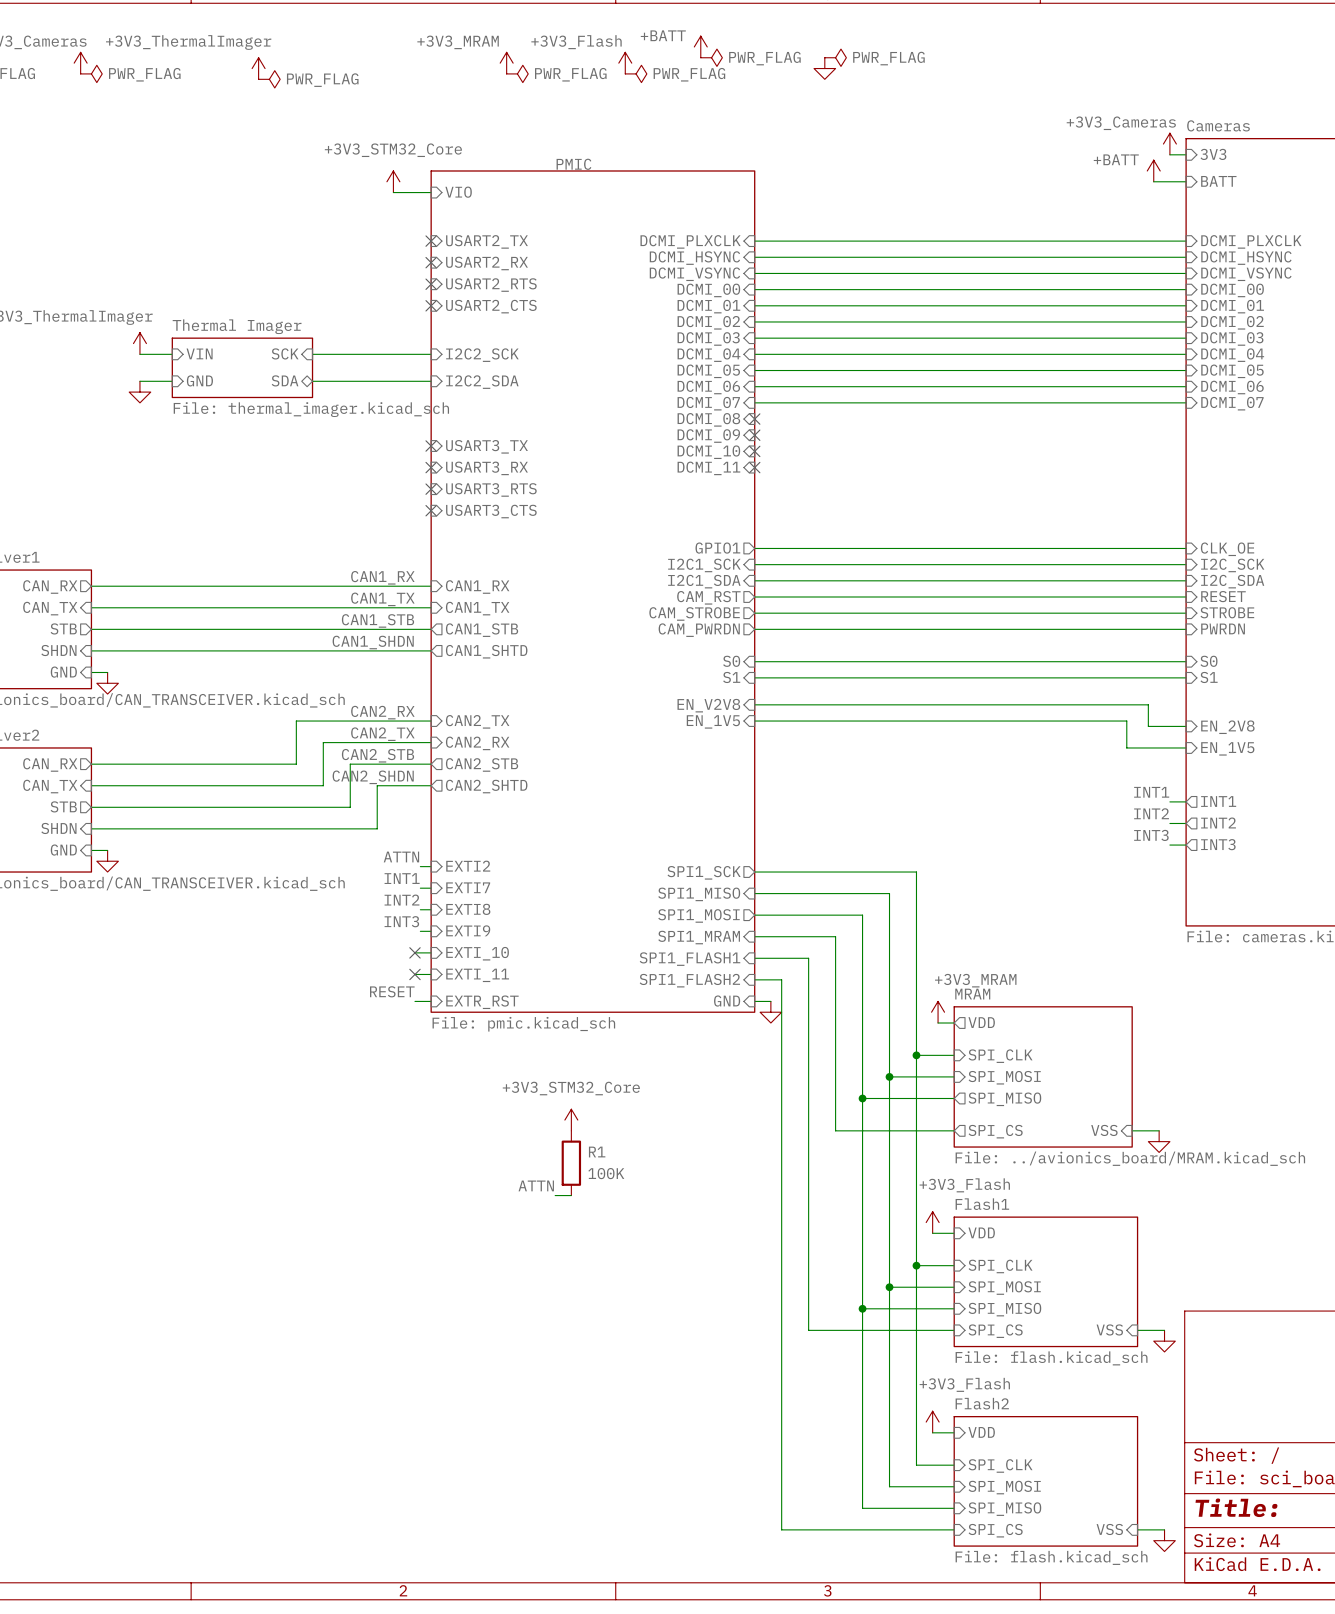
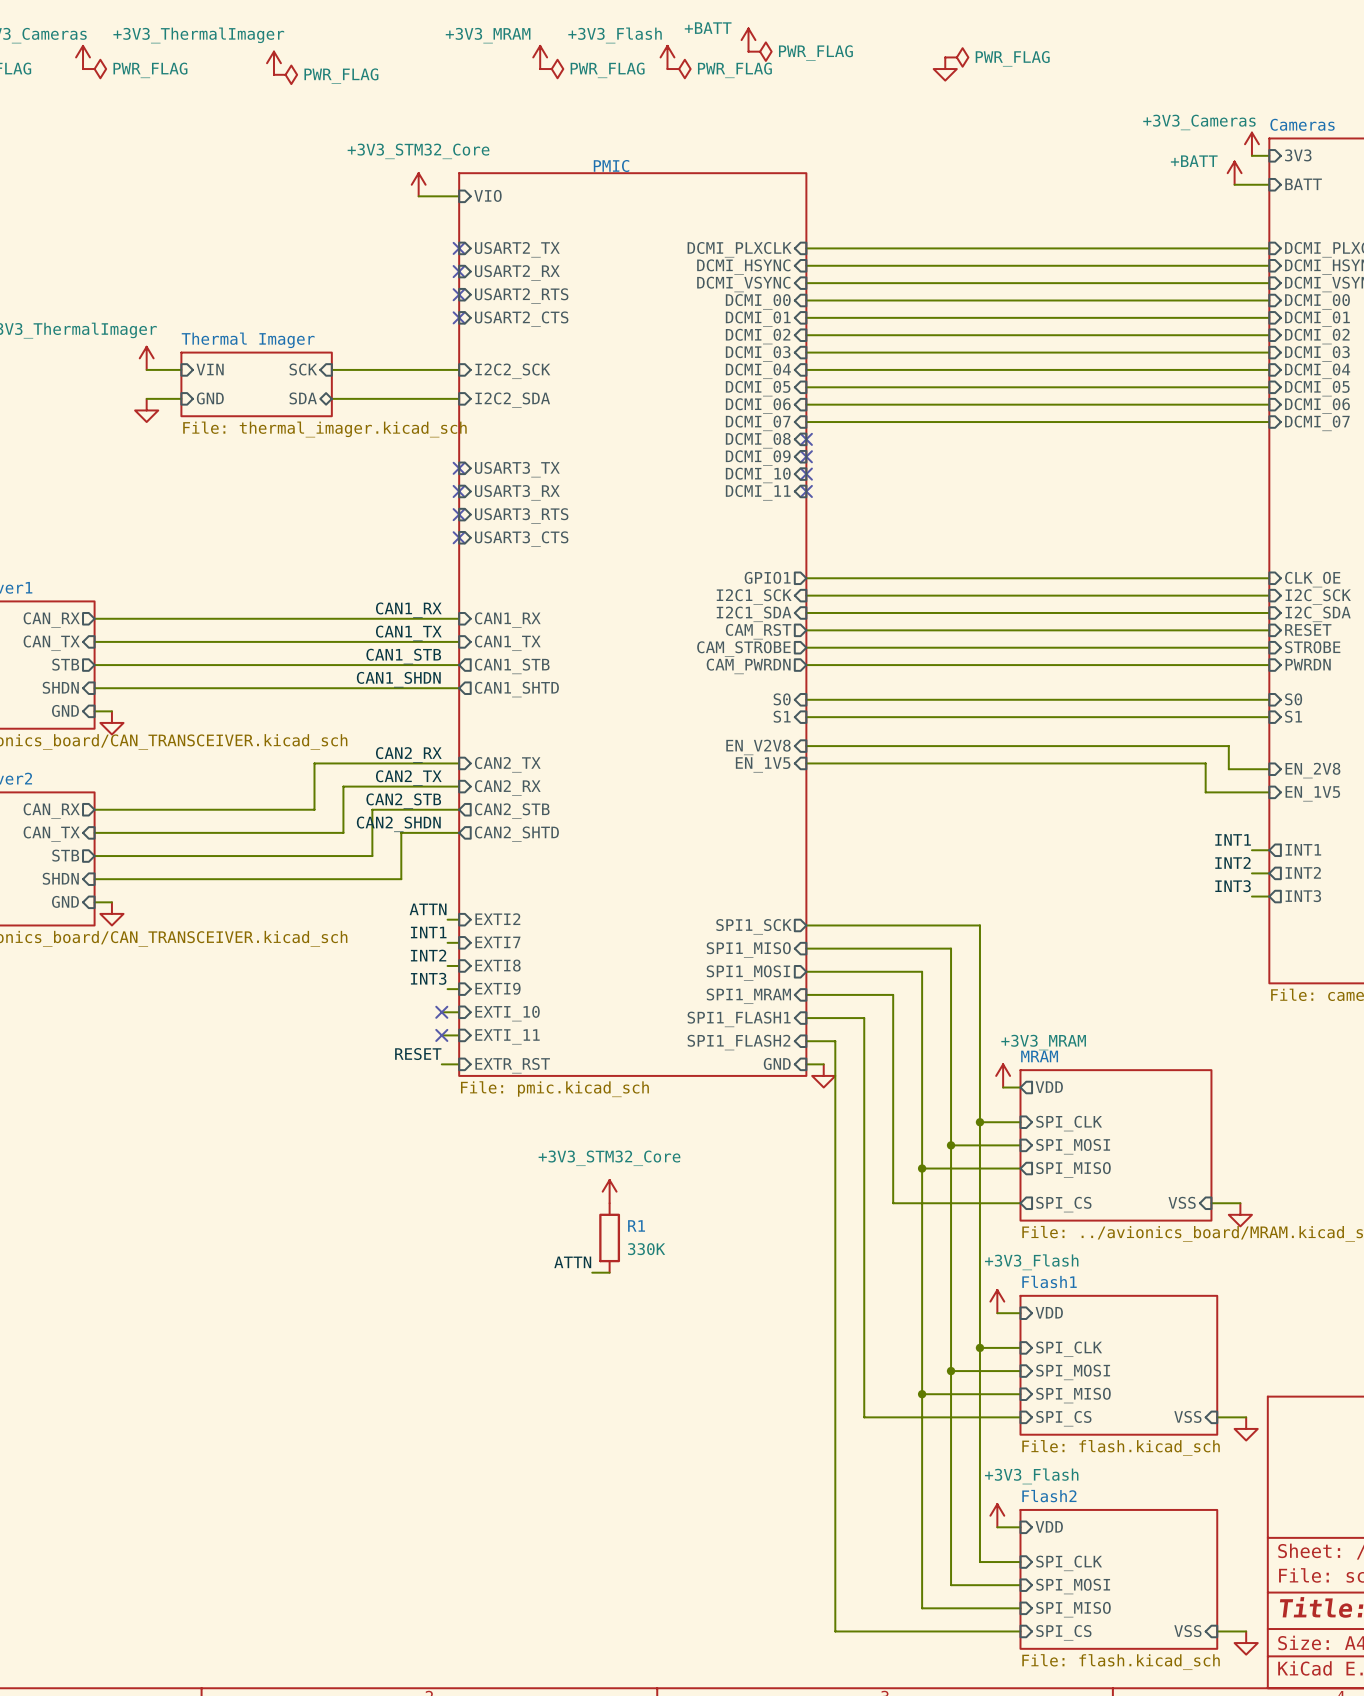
power symbol position: PWR_FLAG (835, 57) -> PWR_FLAG (956, 57)
power symbol position: (824, 68) -> (945, 69)
R1 value: 100K (606, 1173) -> 330K (646, 1249)

